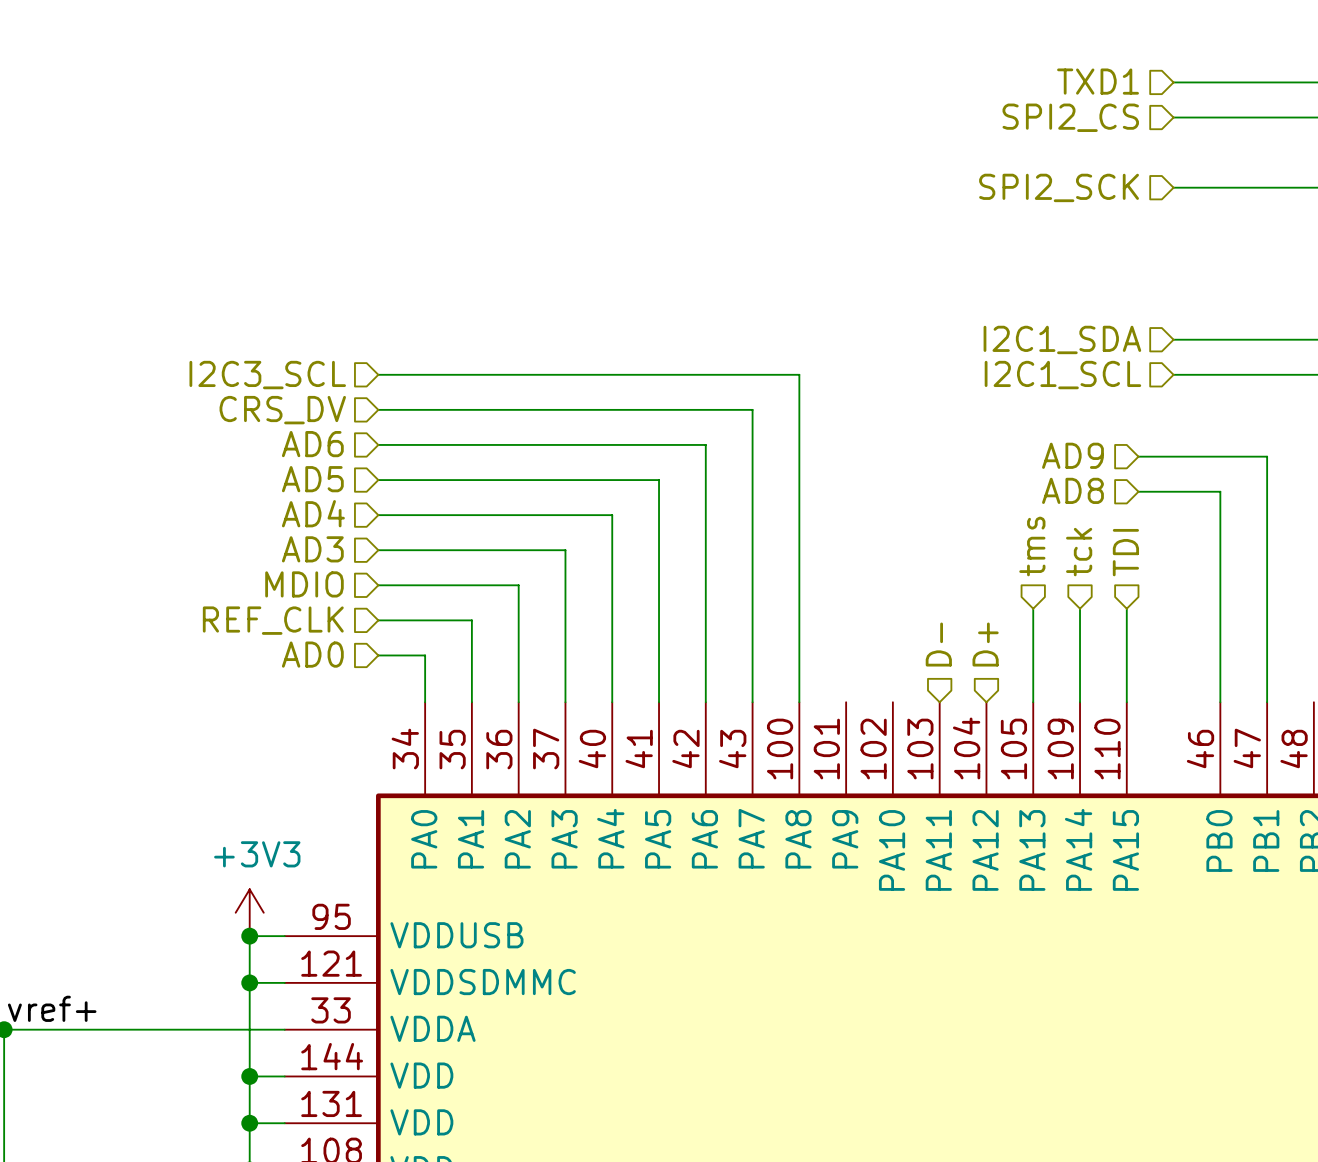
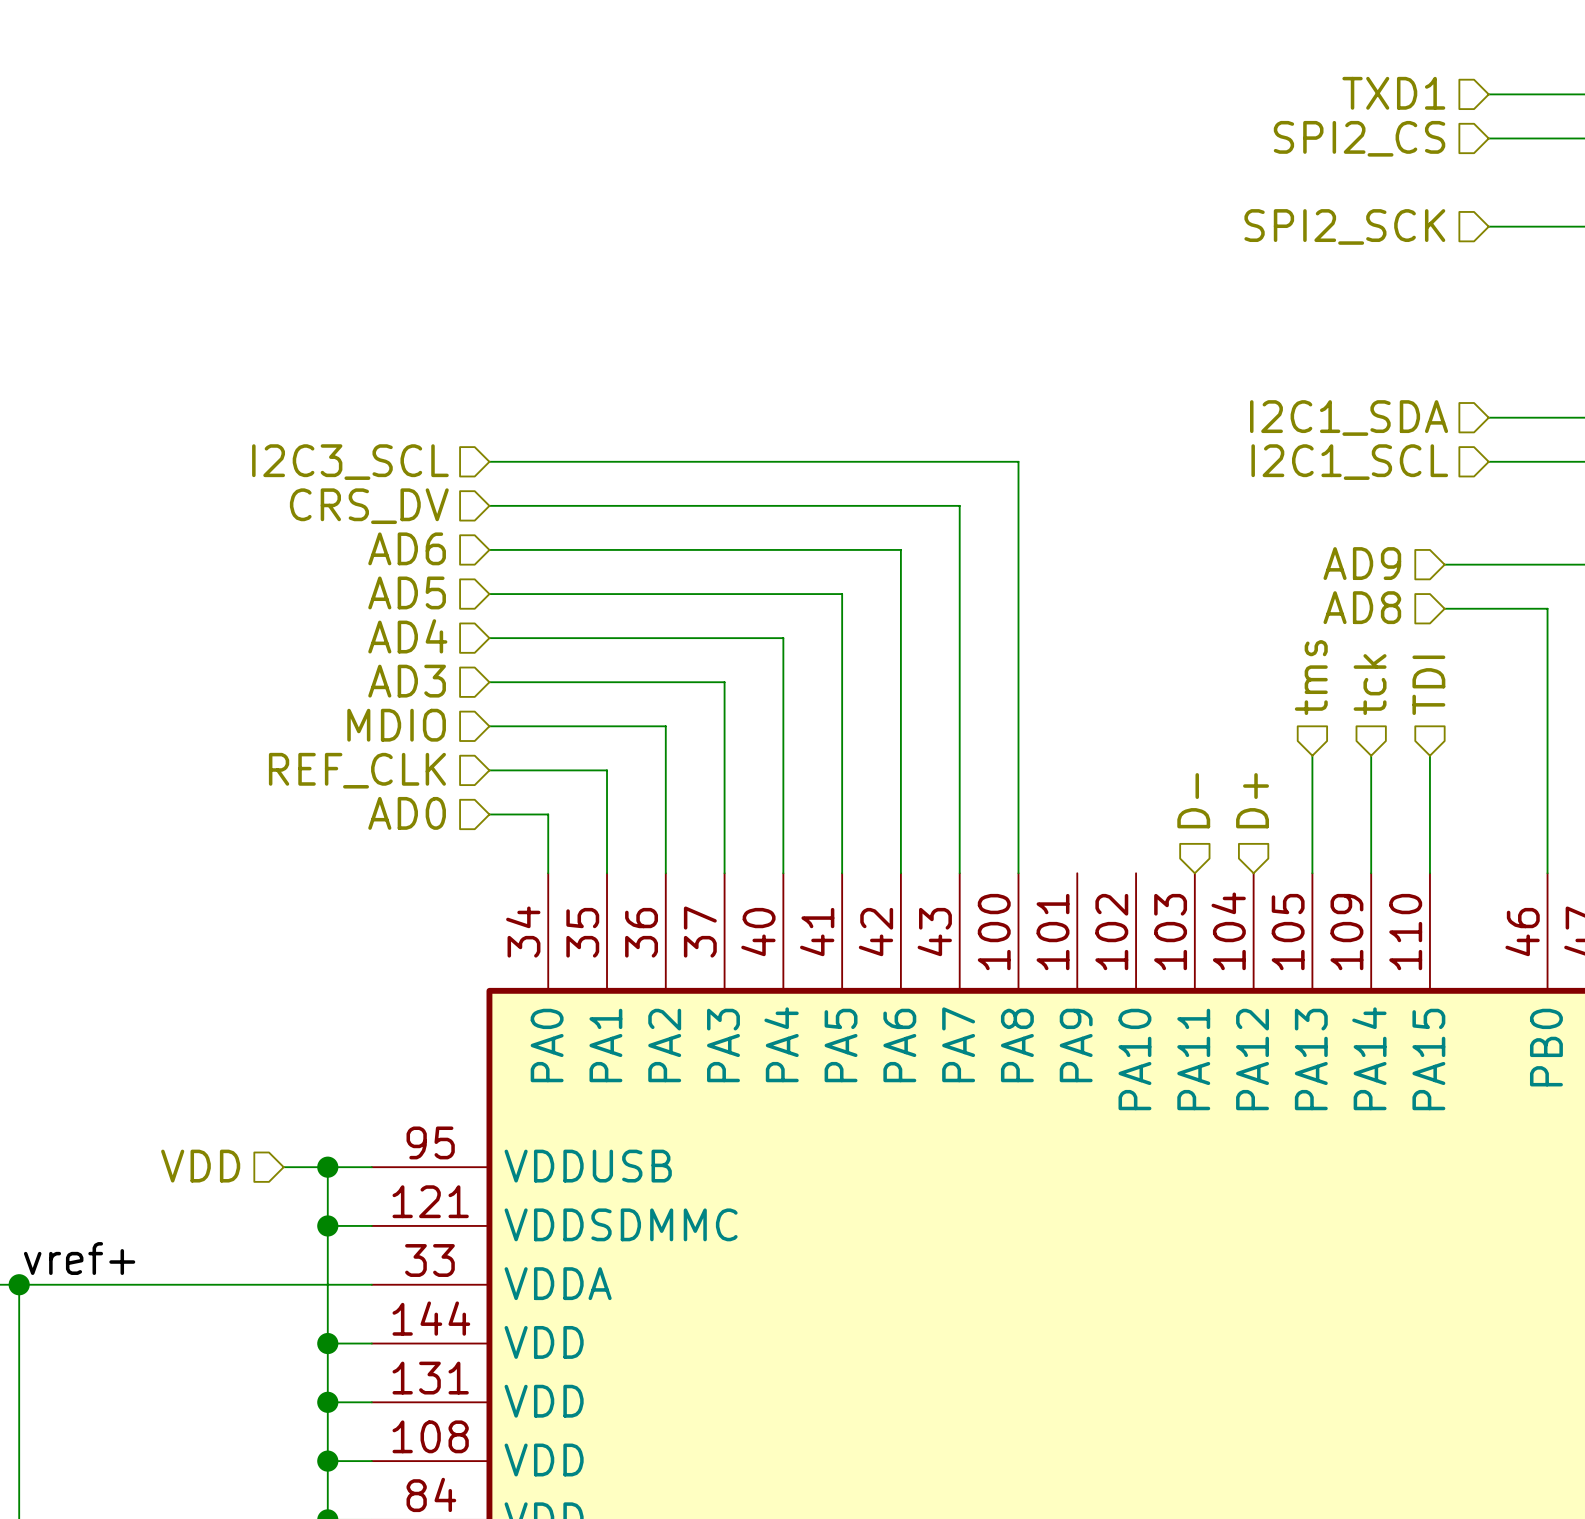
power symbol: +3V3 (249, 912) -> none
hierarchical label: none -> VDD (200, 1166)
wire: none -> (283, 1167) (327, 1167)

